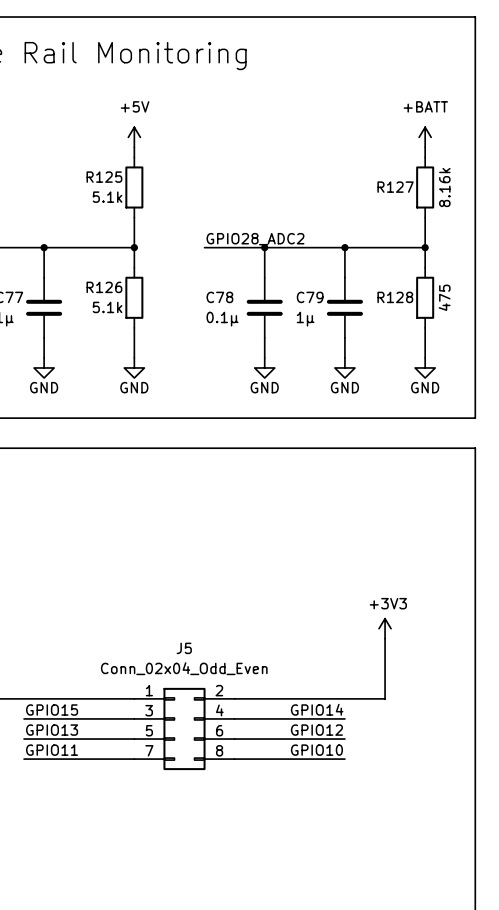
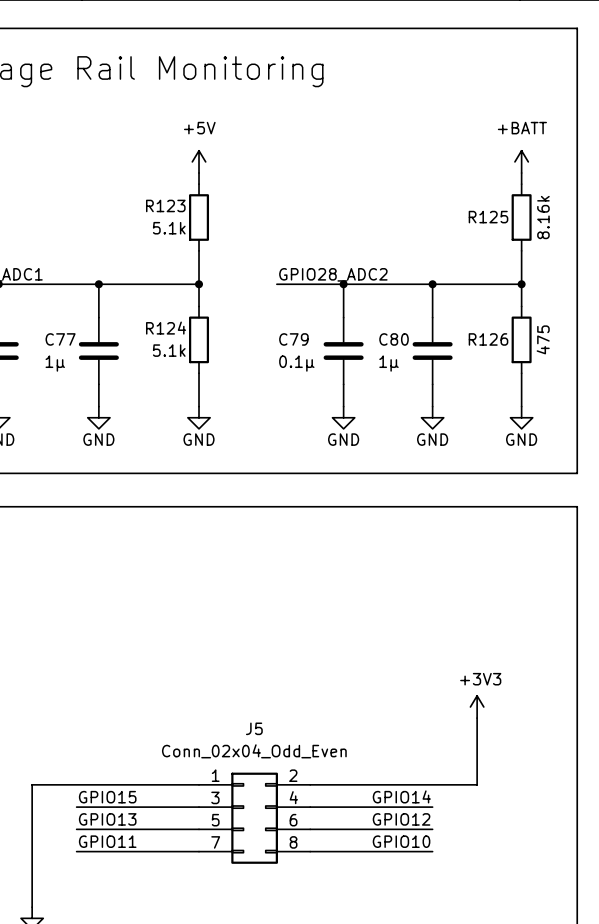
R125 name: R125 (104, 177) -> R123 (165, 205)
R127 name: R127 (395, 187) -> R125 (488, 217)
R126 name: R126 (104, 287) -> R124 (166, 328)
C78 name: C78 (219, 297) -> C79 (293, 339)
C79 name: C79 (310, 297) -> C80 (394, 339)
R128 name: R128 (395, 297) -> R126 (488, 339)

